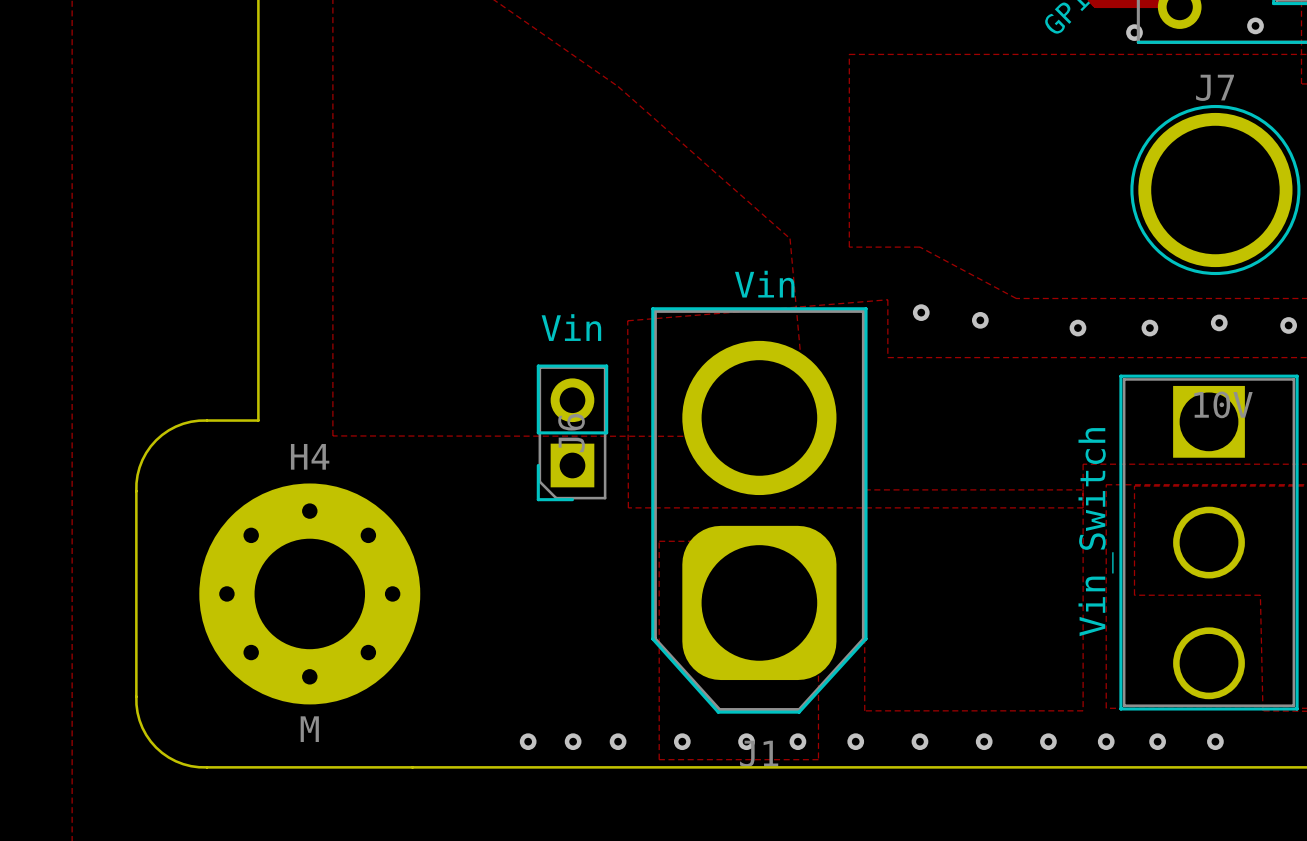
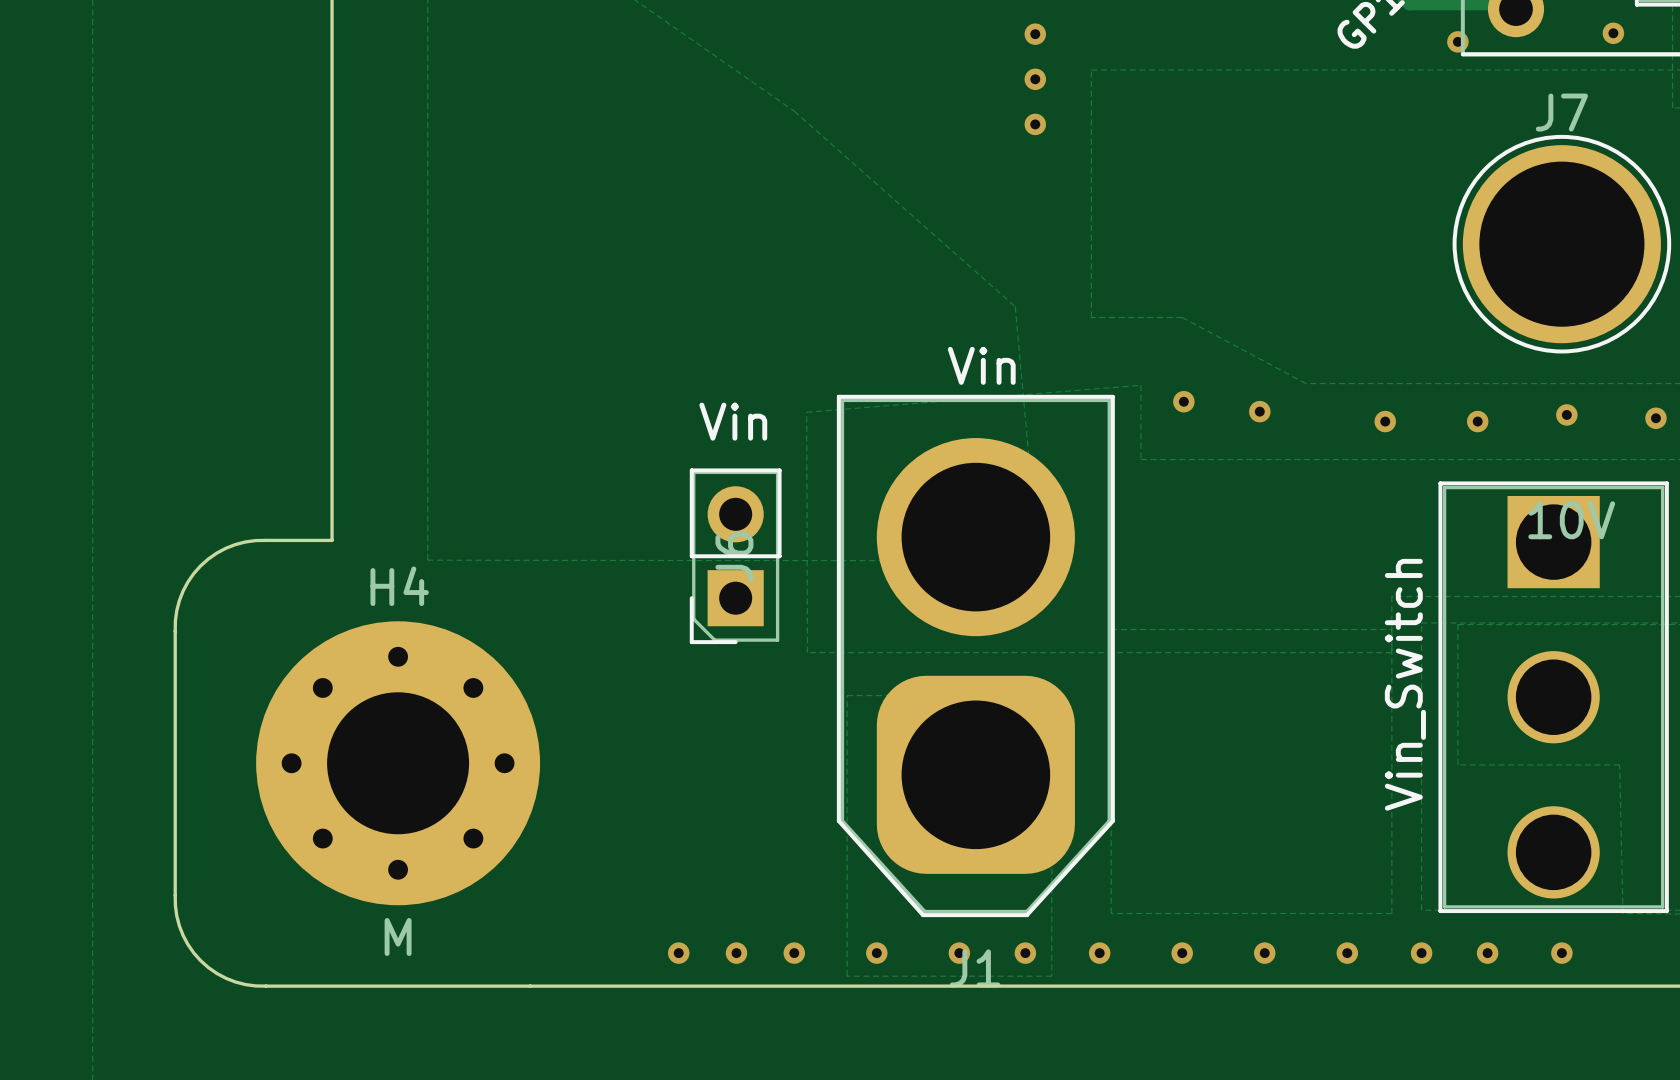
via: none -> (1035, 34)
via: none -> (1035, 79)
via: none -> (1035, 124)

